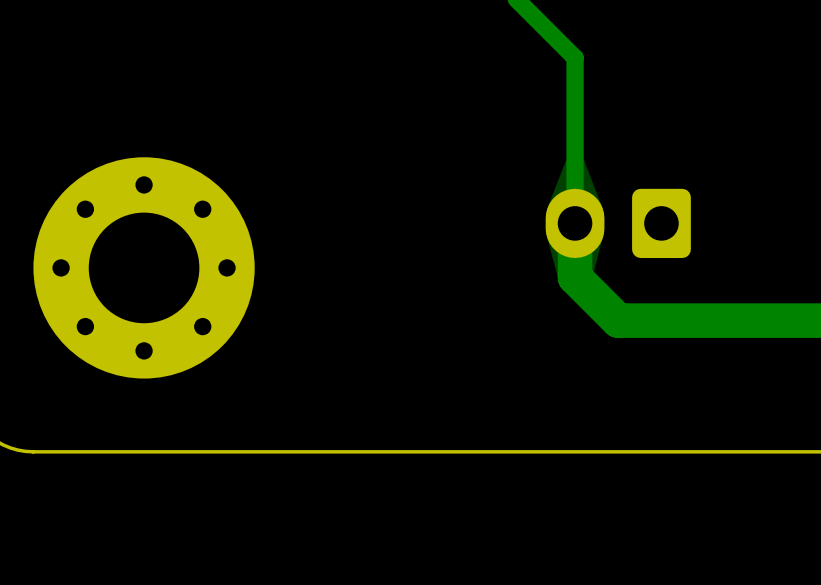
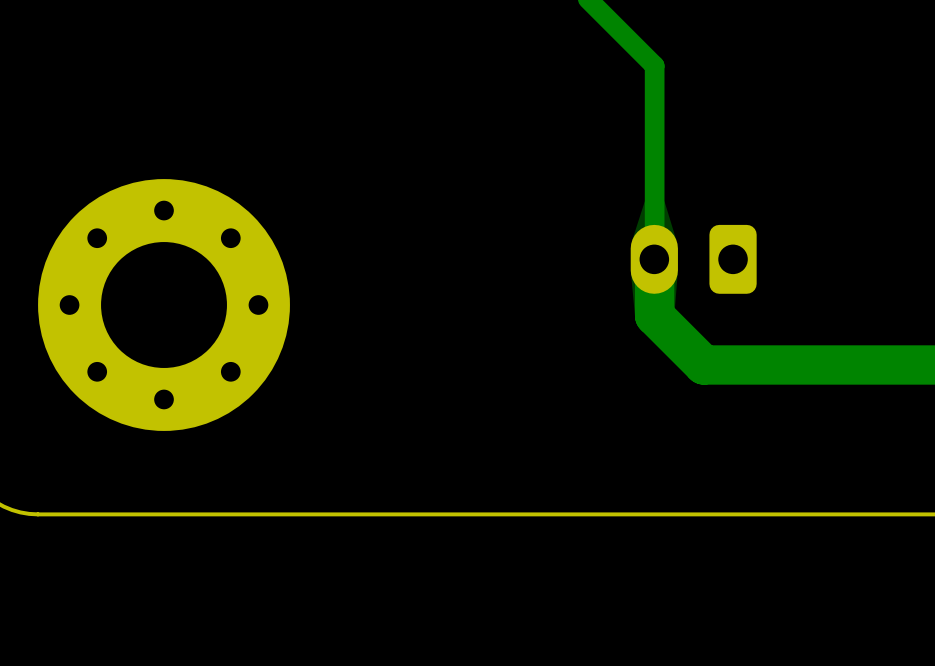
part footprint: [545, 188, 691, 258] -> [630, 224, 757, 294]

